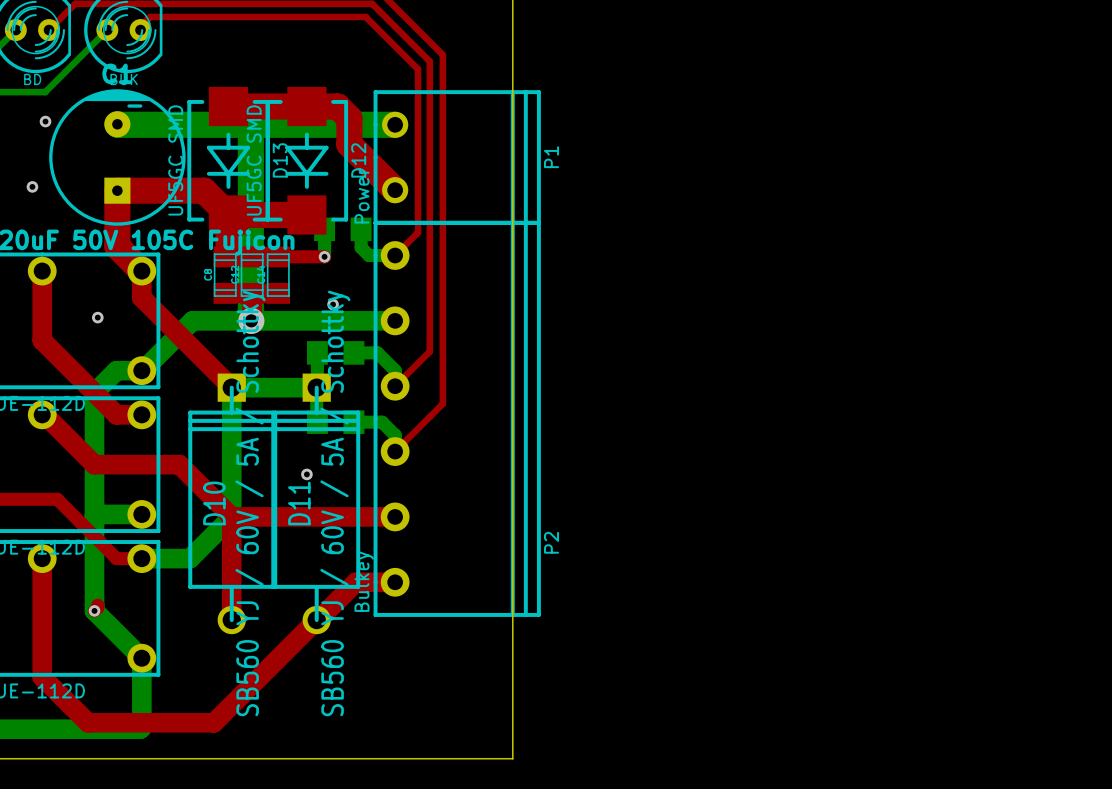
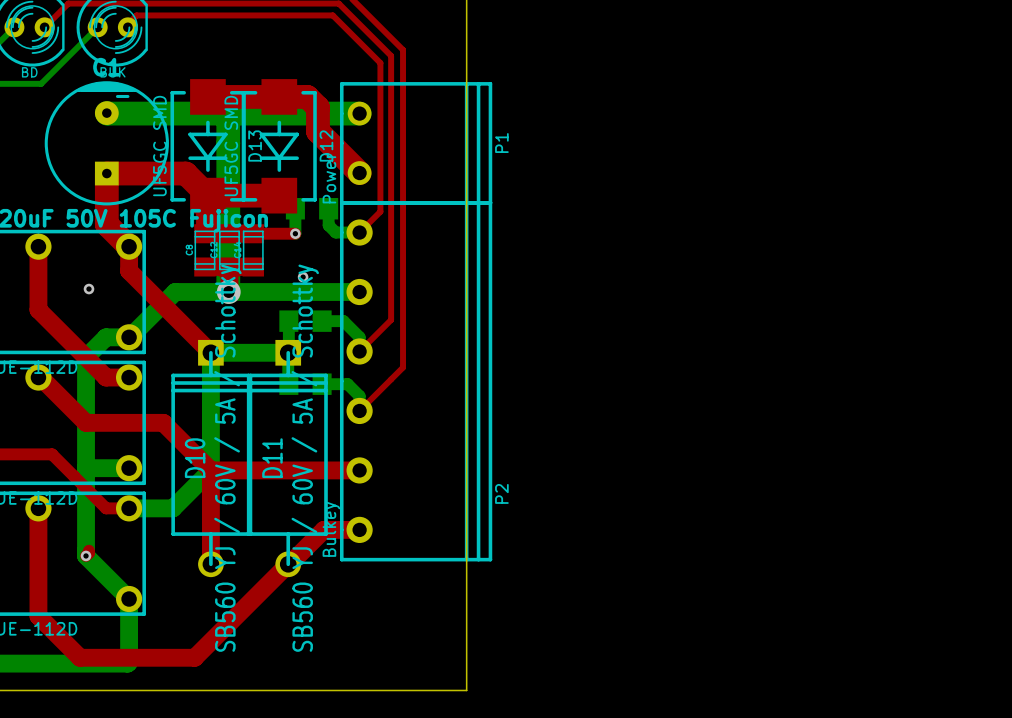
via: (45, 121) -> none
via: (32, 186) -> none
via: (306, 474) -> none

